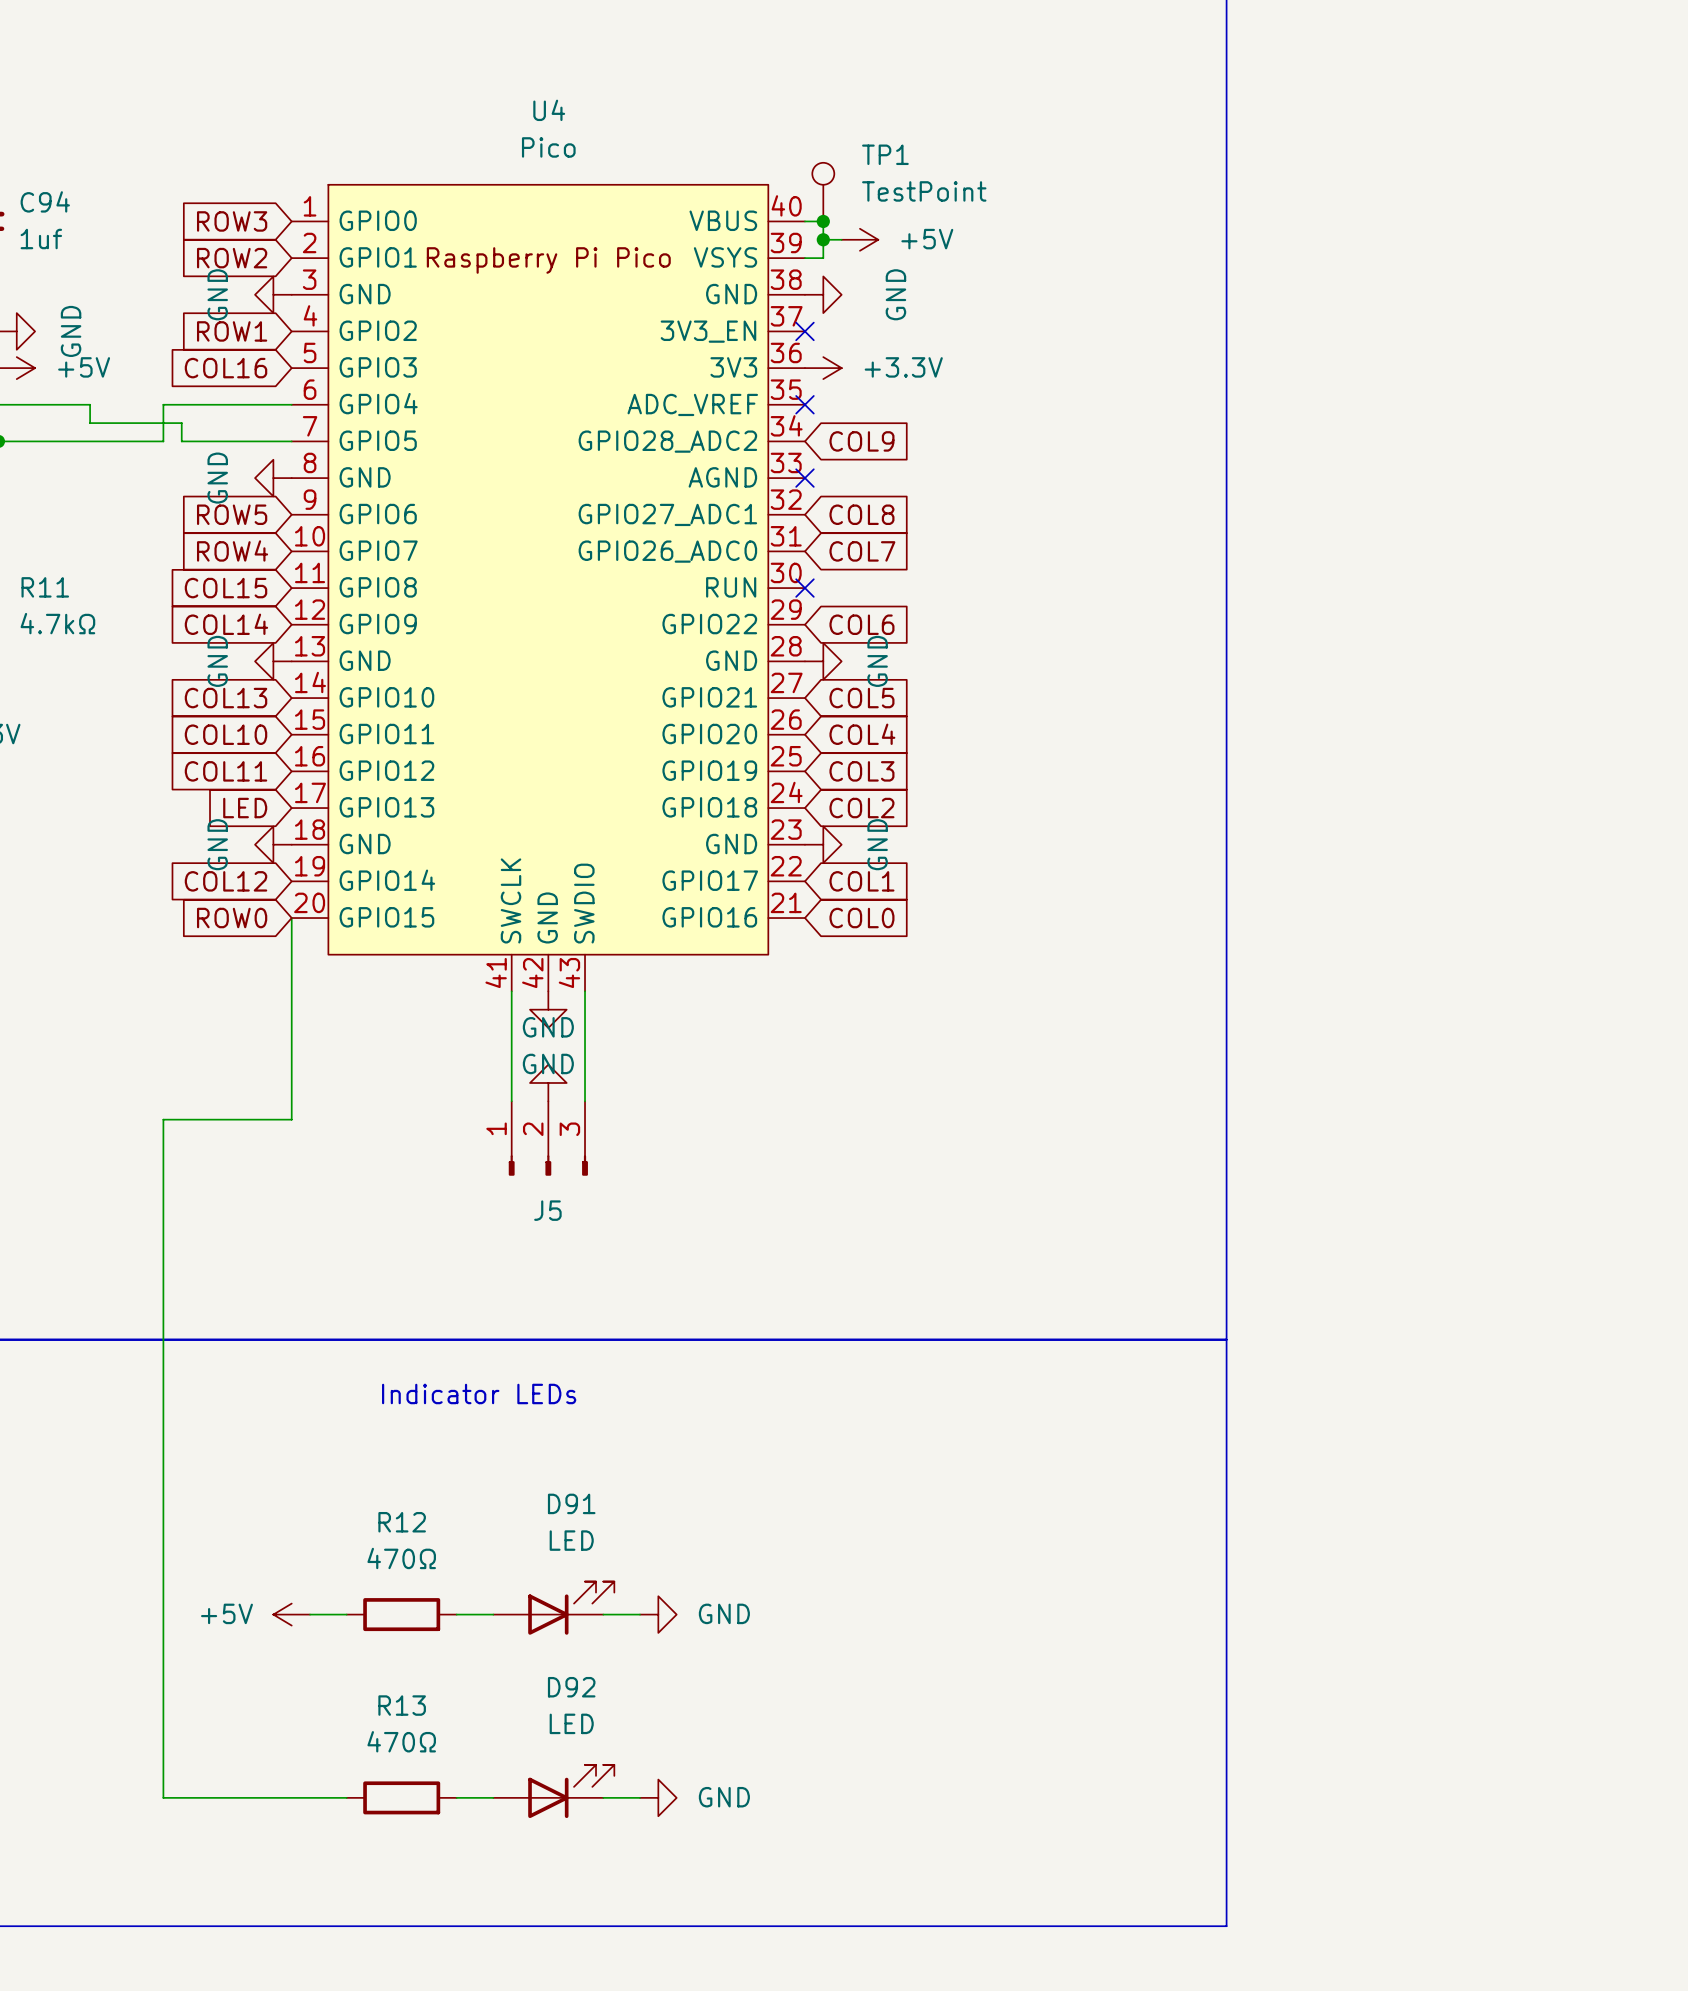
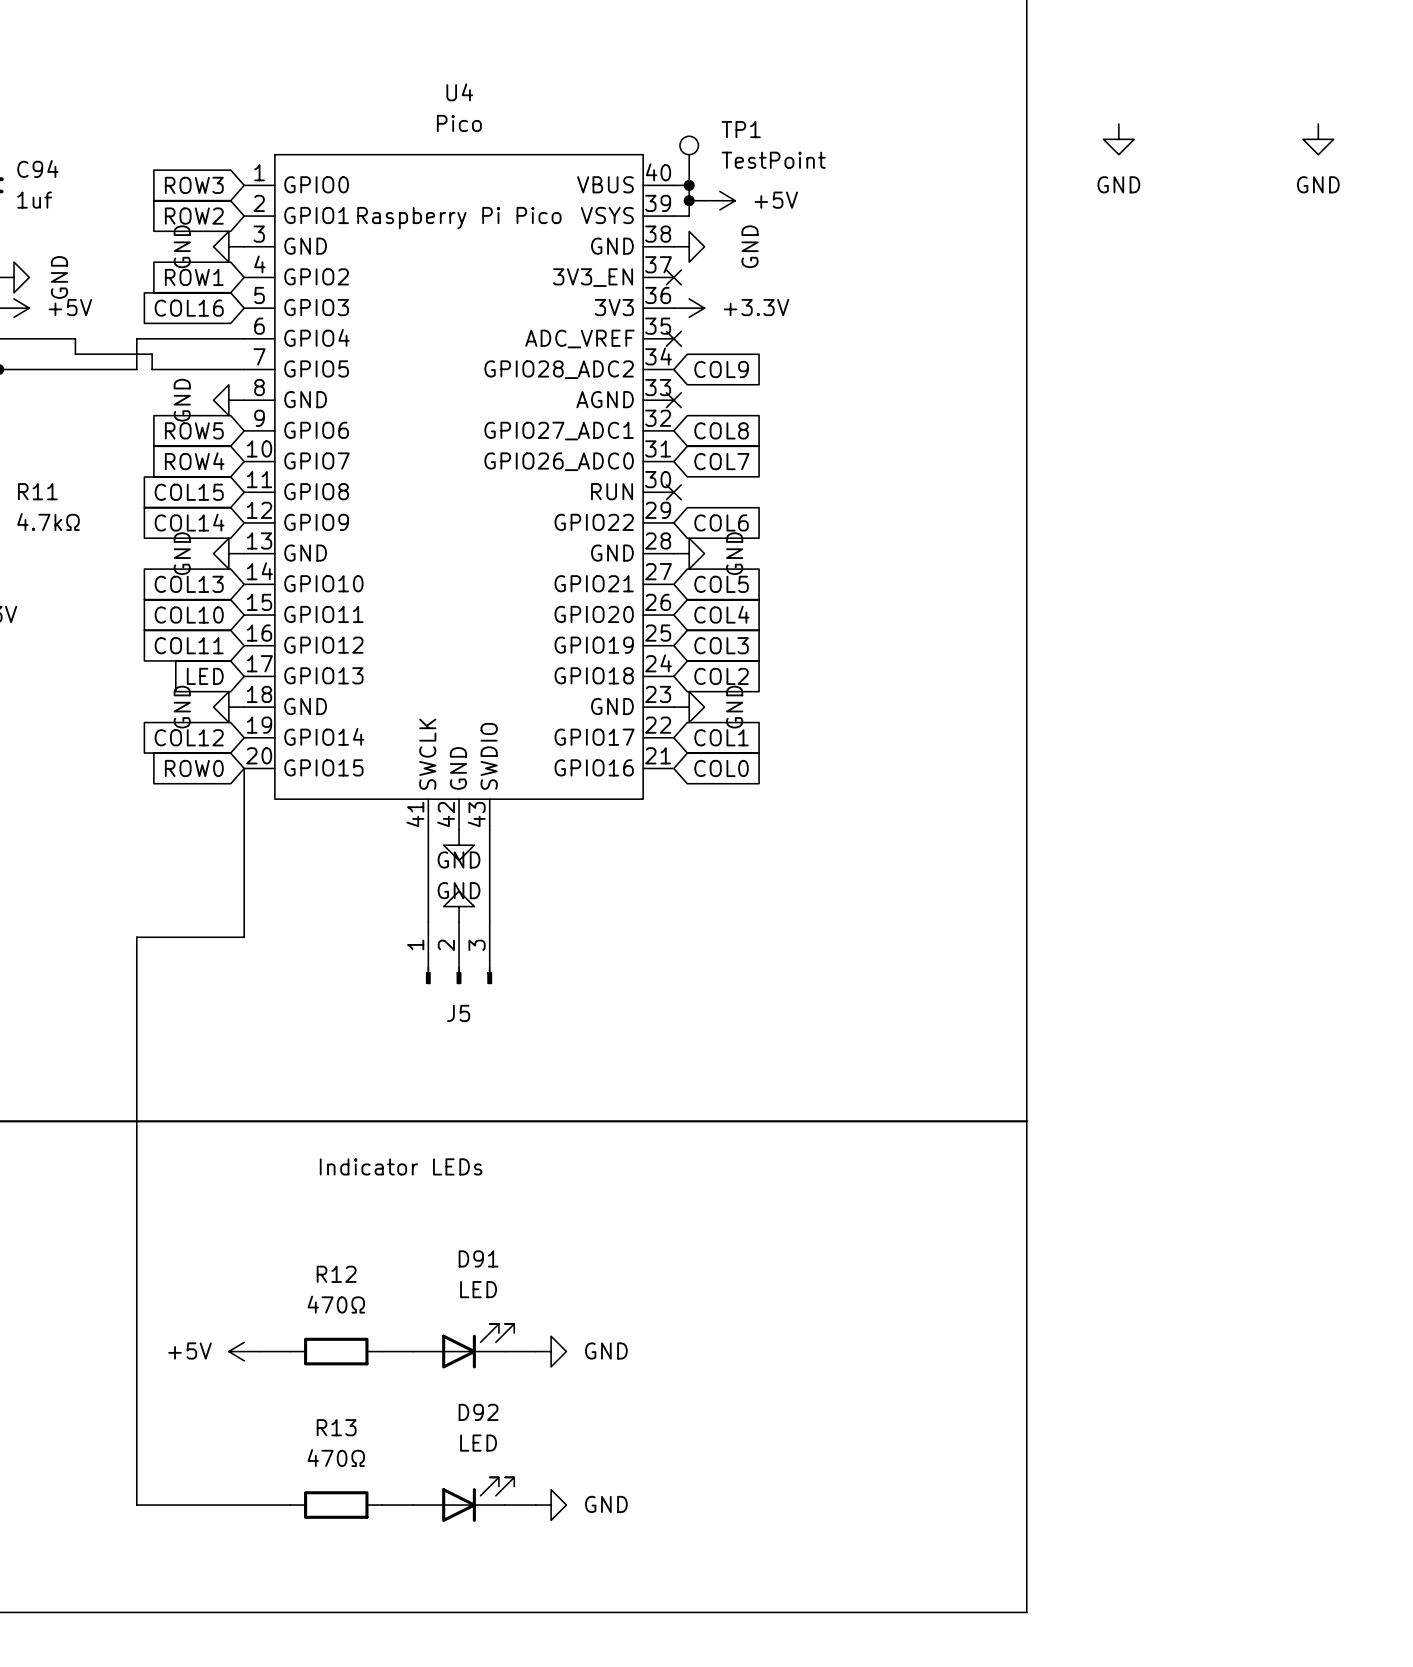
power symbol: none -> GND (1118, 139)
power symbol: none -> GND (1318, 139)

